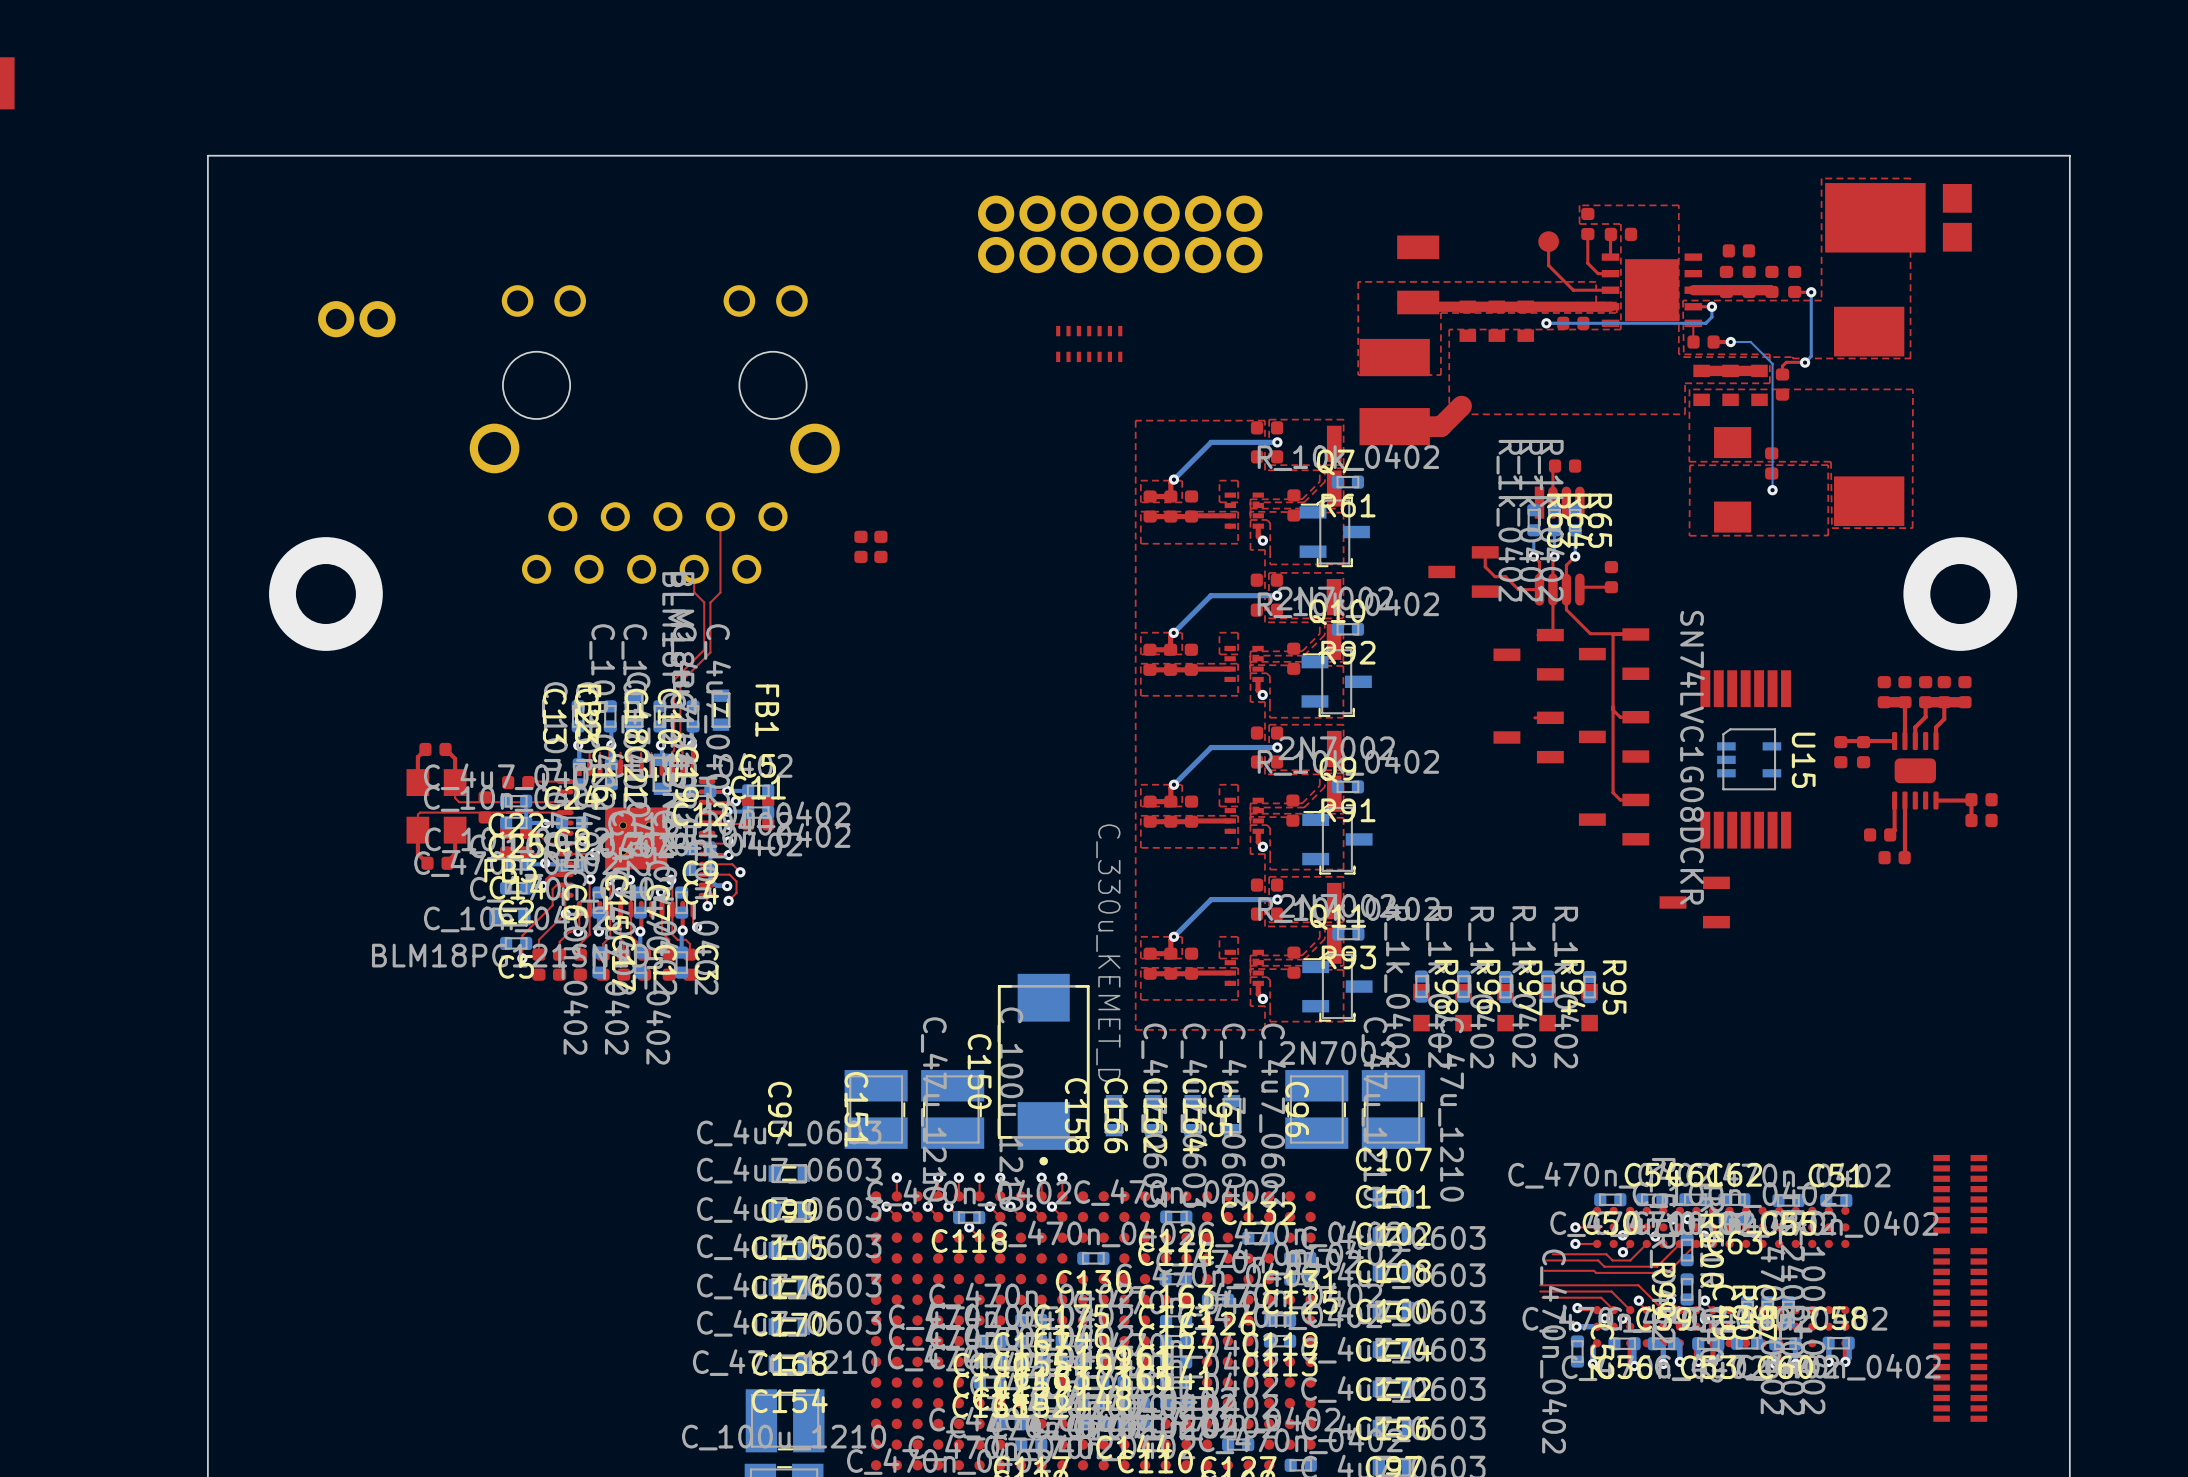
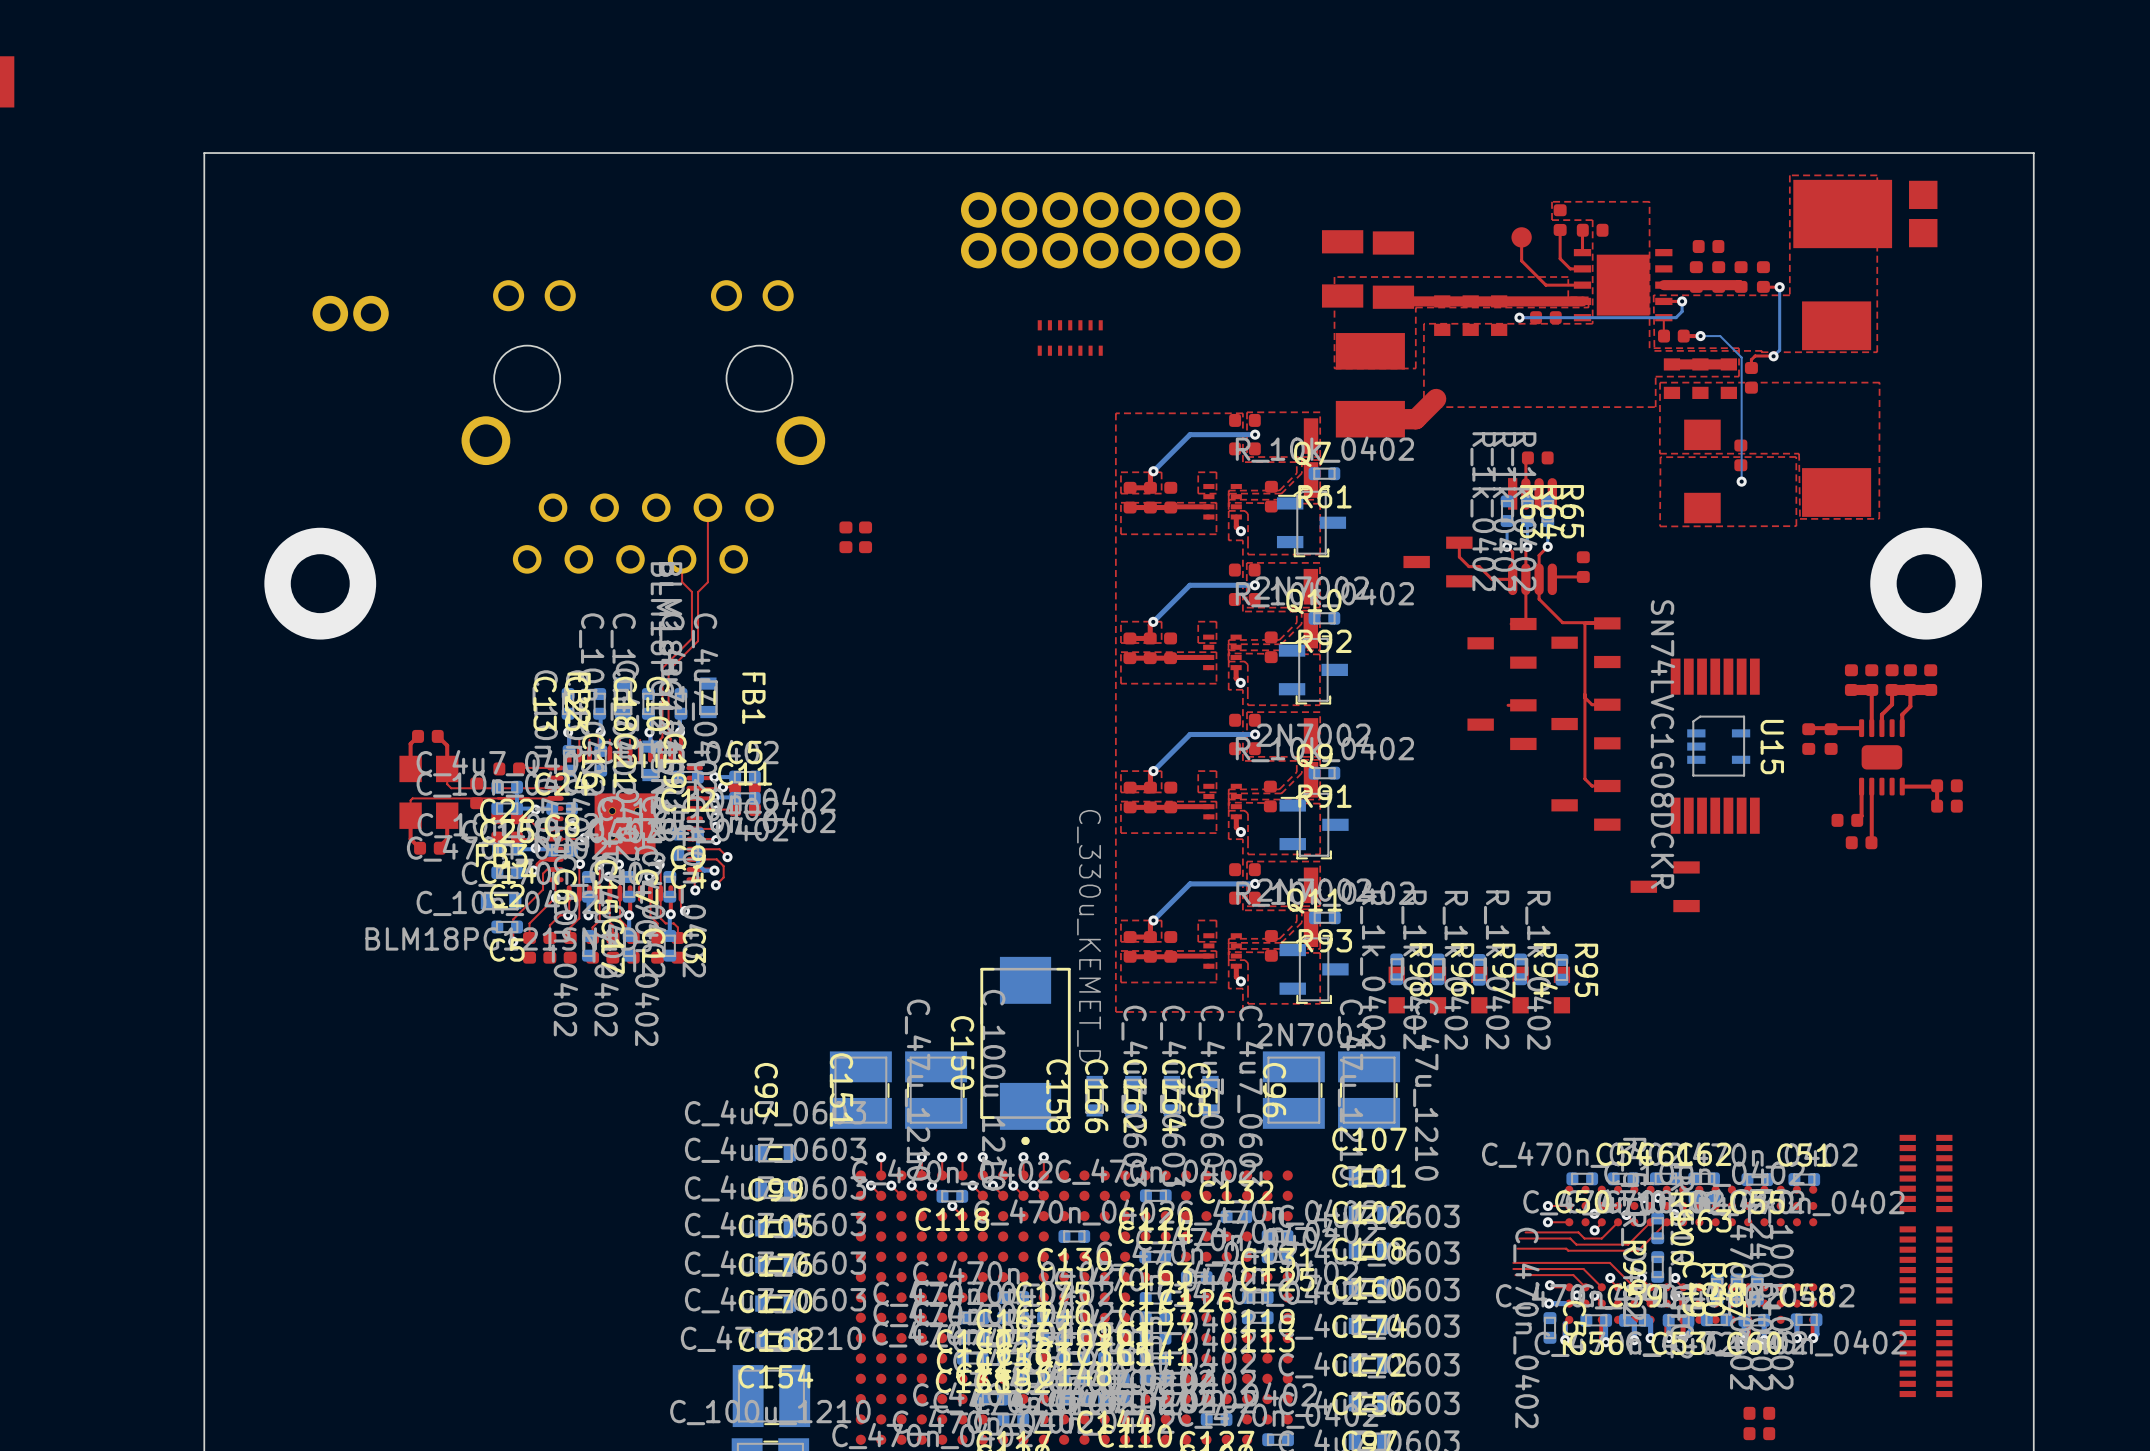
part: none -> (1342, 268)
part: none -> (1759, 1413)
part: none -> (1759, 1433)

